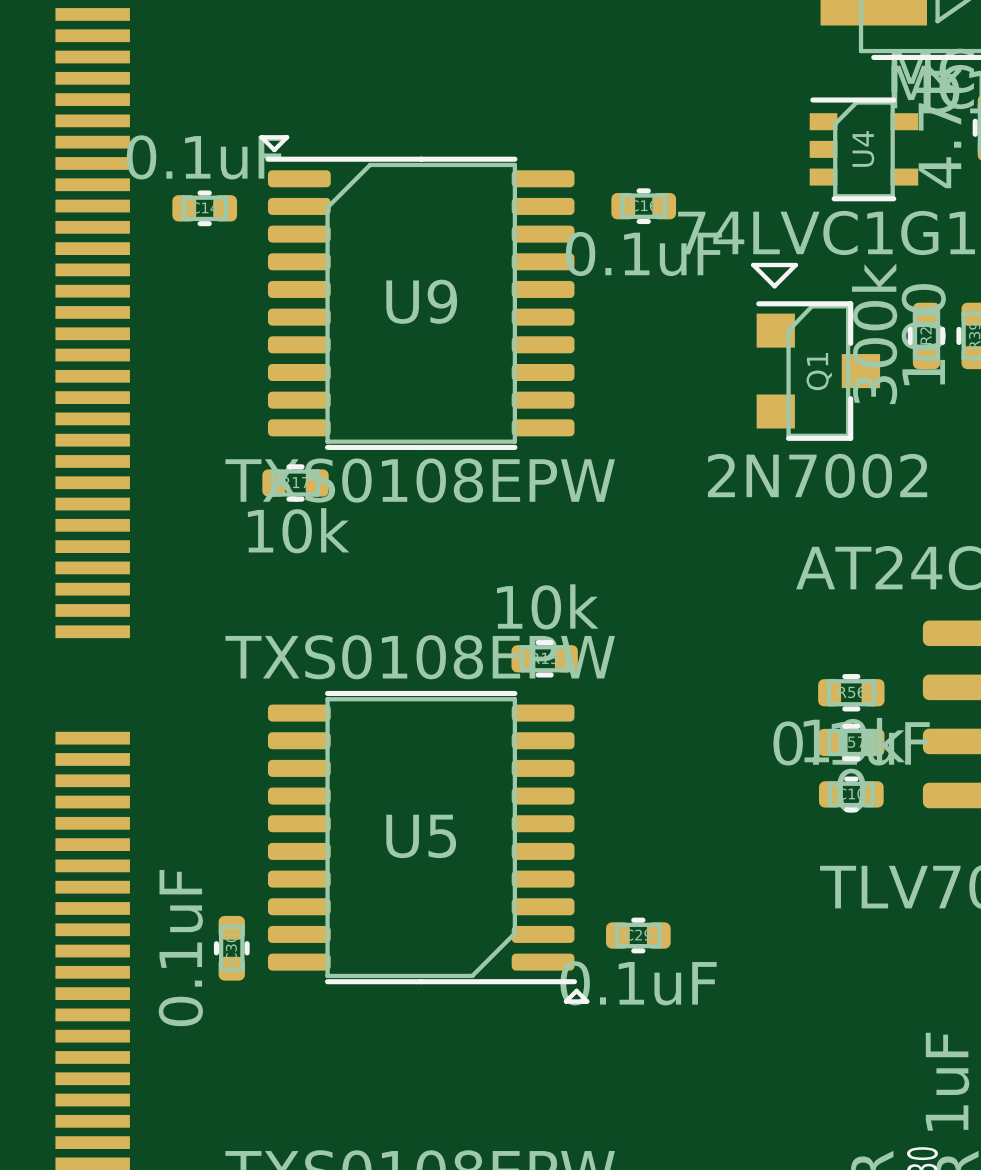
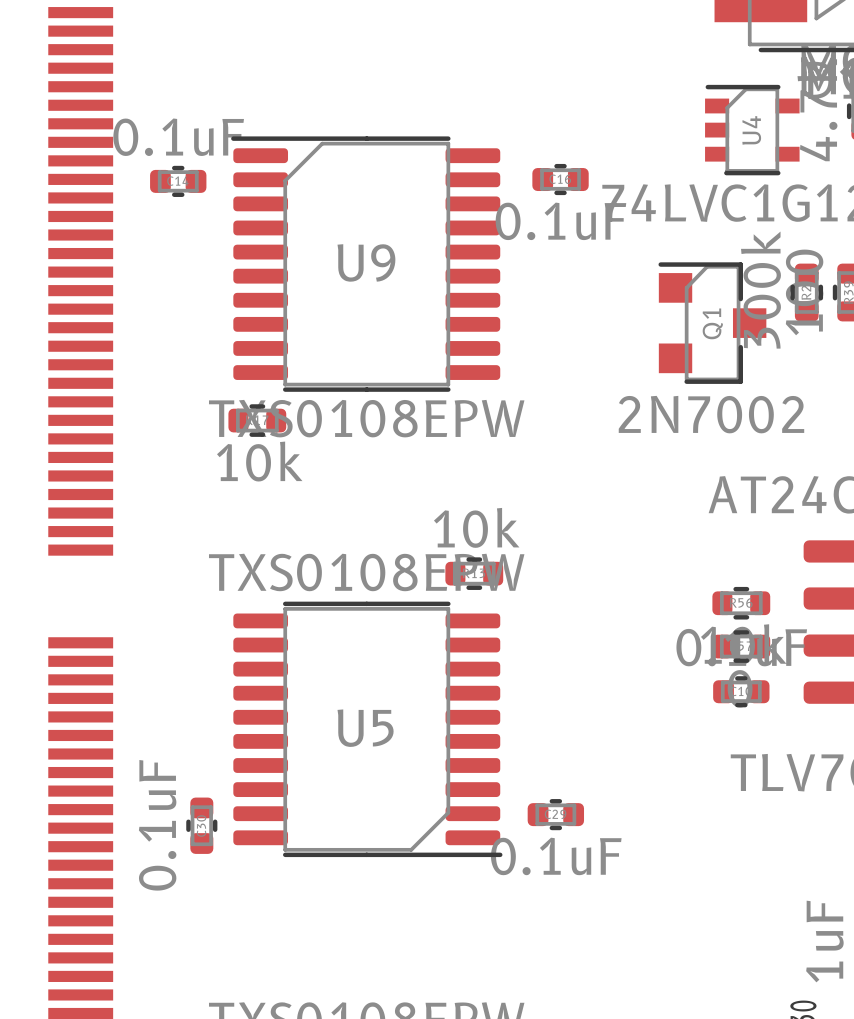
line: (261, 137) (274, 150) (287, 137) (261, 137) -> none
line: (753, 265) (774, 286) (795, 265) (753, 265) -> none
line: (576, 990) (587, 1001) (565, 1001) (576, 990) -> none

